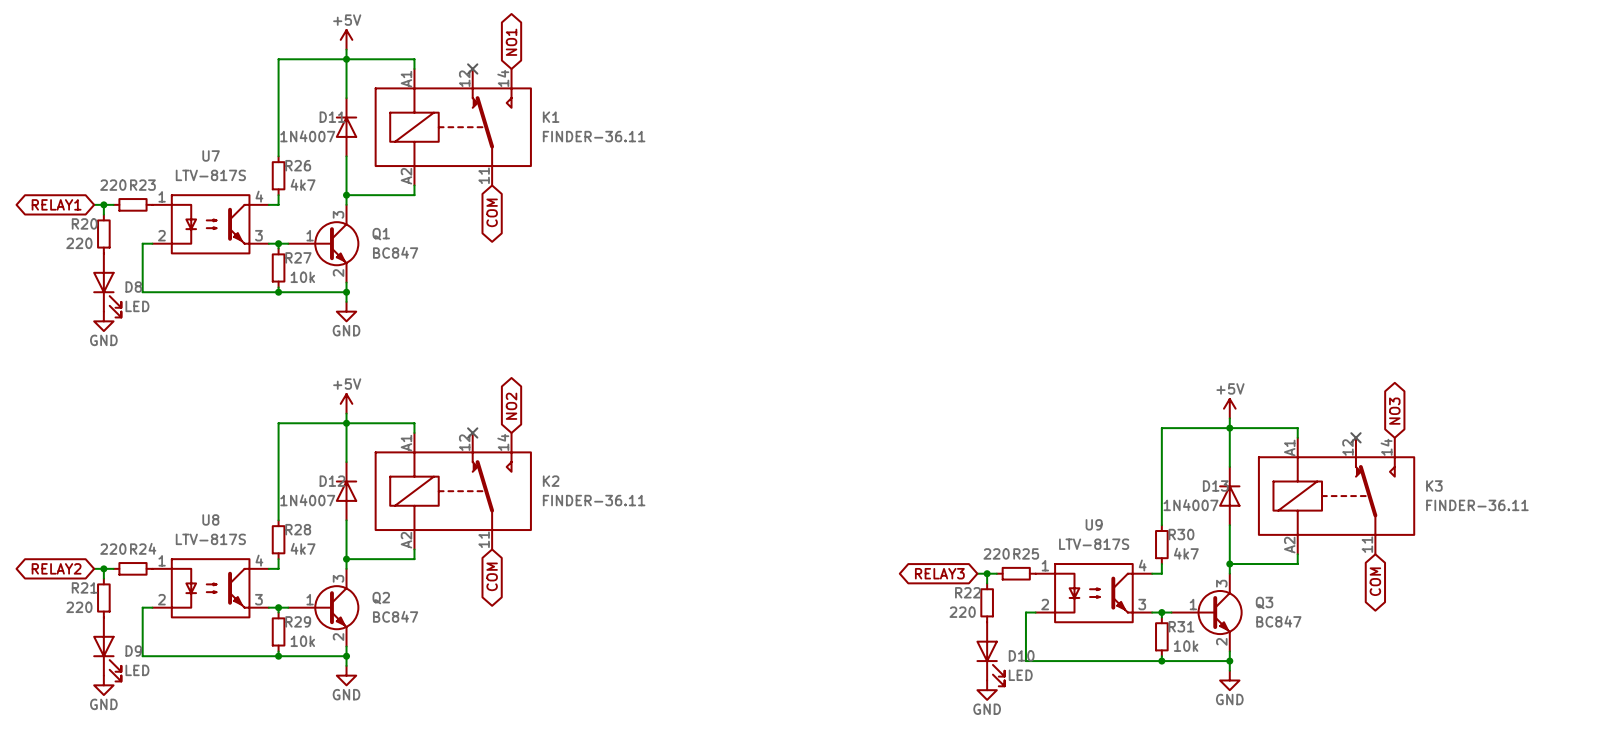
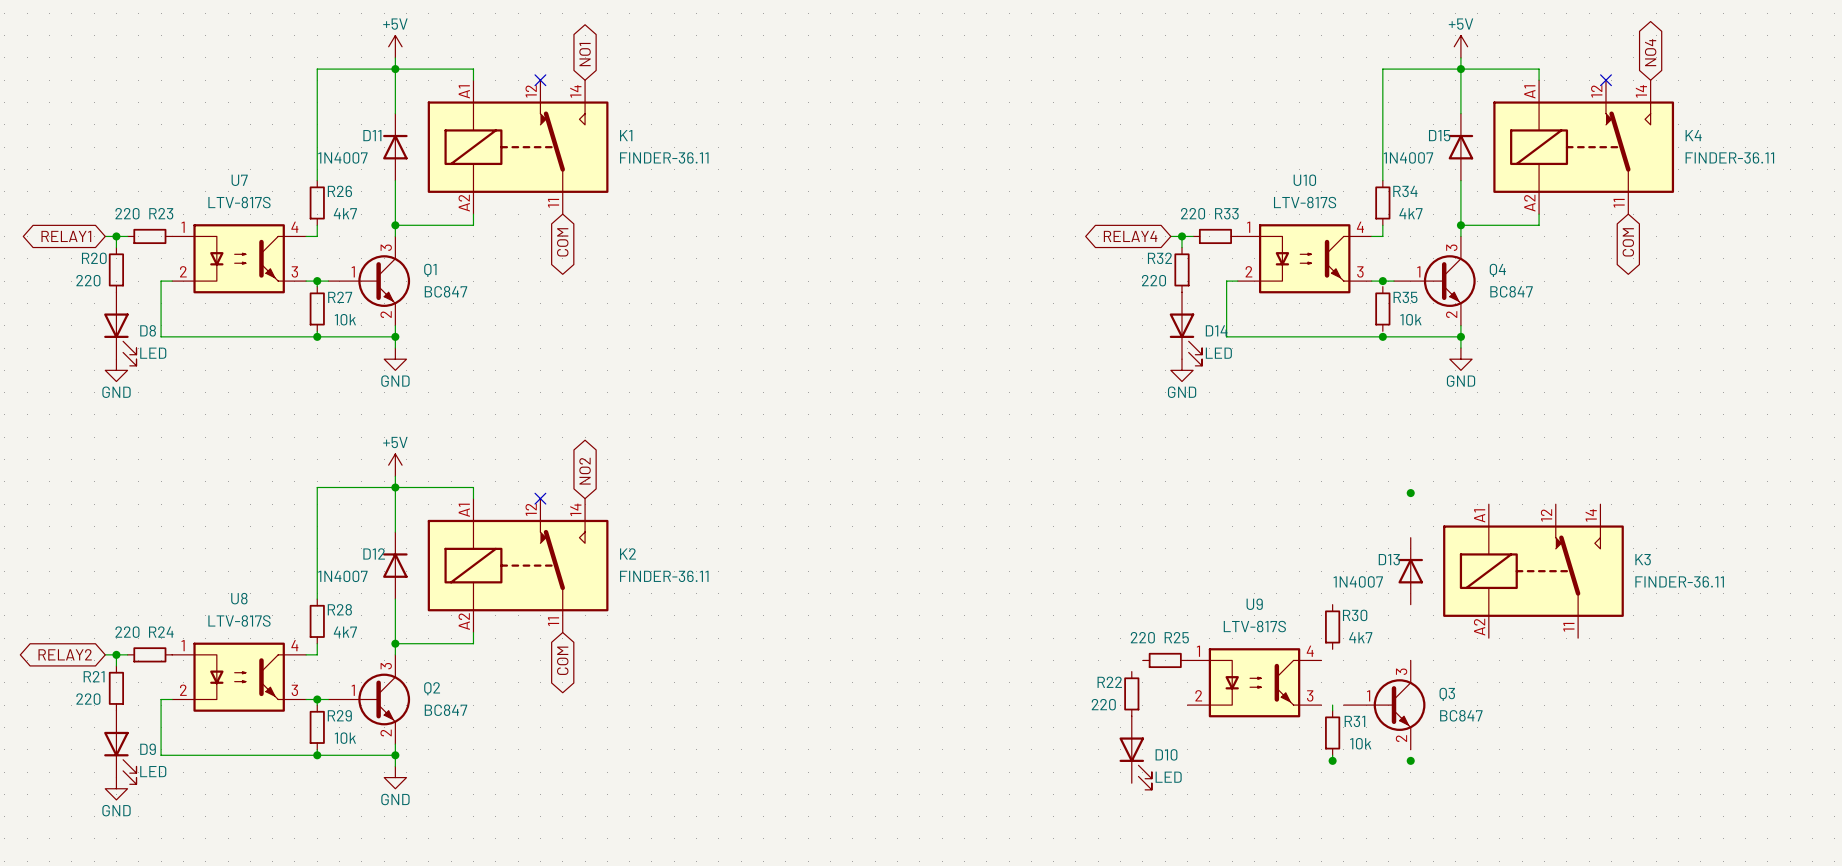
power symbol: none -> +5V (1460, 46)
global label: none -> NO4 (1650, 52)
wire: none -> (1460, 57) (1460, 113)
junction: none -> (1460, 69)
wire: none -> (1539, 80) (1539, 69) (1382, 69) (1382, 180)
no-connect mark: none -> (1605, 80)
D15: none -> 1N4007 (1460, 147)
K4: none -> FINDER-36.11 (1583, 147)
wire: none -> (1460, 180) (1460, 236)
R34: none -> 4k7 (1382, 202)
wire: none -> (1539, 214) (1539, 225) (1460, 225)
wire: none -> (1382, 225) (1382, 236) (1371, 236)
junction: none -> (1460, 225)
global label: none -> RELAY4 (1130, 236)
wire: none -> (1170, 236) (1193, 236)
wire: none -> (1181, 236) (1181, 247)
junction: none -> (1181, 236)
R33: none -> 220 (1215, 236)
global label: none -> COM (1628, 242)
U10: none -> LTV-817S (1304, 258)
R32: none -> 220 (1181, 269)
wire: none -> (1237, 281) (1226, 281) (1226, 336) (1460, 336)
wire: none -> (1371, 281) (1393, 281)
junction: none -> (1382, 281)
Q4: none -> BC847 (1434, 281)
R35: none -> 10k (1382, 308)
wire: none -> (1460, 325) (1460, 348)
D14: none -> LED (1185, 329)
junction: none -> (1382, 336)
junction: none -> (1460, 336)
power symbol: none -> GND (1460, 359)
power symbol: none -> GND (1181, 370)
power symbol: +5V (1229, 408) -> none
global label: NO3 (1394, 411) -> none
wire: (1229, 418) (1229, 466) -> none
wire: (1297, 437) (1297, 428) (1161, 428) (1161, 525) -> none
no-connect mark: (1355, 437) -> none
wire: (1229, 525) (1229, 573) -> none
wire: (1297, 554) (1297, 564) (1229, 564) -> none
wire: (1161, 564) (1161, 573) (1152, 573) -> none
junction: (1229, 564) -> none
global label: RELAY3 (939, 573) -> none
wire: (977, 573) (996, 573) -> none
wire: (987, 573) (987, 583) -> none
junction: (987, 573) -> none
global label: COM (1375, 581) -> none
wire: (1035, 612) (1025, 612) (1025, 661) (1229, 661) -> none
wire: (1152, 612) (1171, 612) -> none
junction: (1161, 612) -> none
wire: (1229, 651) (1229, 670) -> none
power symbol: GND (1229, 680) -> none
power symbol: GND (987, 690) -> none

